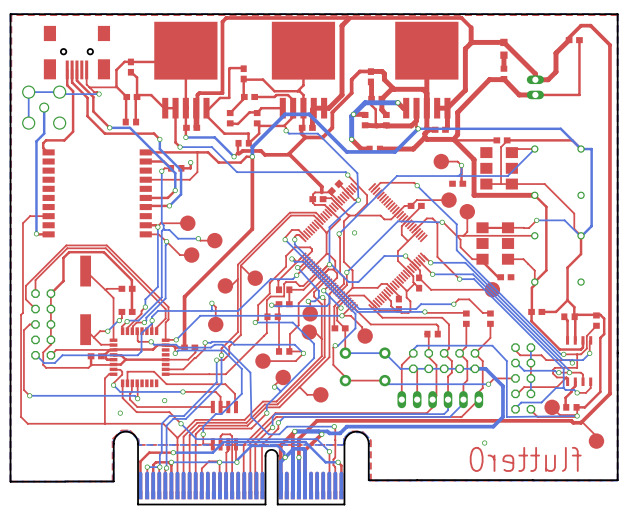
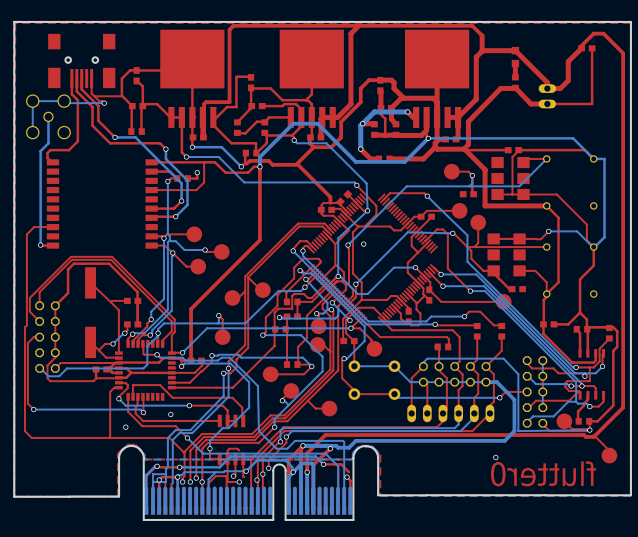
top track: (334, 426) (335, 440) -> none
bottom track: none -> (343, 440) (344, 510)
via: (334, 426) -> none
top track: (189, 435) (189, 495) -> (196, 449) (196, 478)
top track: (183, 436) (183, 495) -> (190, 450) (190, 482)
top track: (232, 436) (232, 495) -> none
top track: (177, 437) (177, 495) -> (183, 452) (184, 476) (182, 482)
top track: (335, 440) (335, 457) (333, 459) (335, 495) -> none
bottom track: (305, 442) (325, 462) (338, 462) -> (313, 456) (323, 464)
top track: none -> (227, 458) (227, 482) (239, 482)
top track: (262, 444) (262, 495) -> (269, 459) (268, 468)
bottom track: (251, 445) (236, 462) (171, 462) -> (258, 460) (246, 471) (184, 472) (181, 475) (177, 475) (177, 510)
top track: none -> (323, 464) (341, 464) (349, 472)
top track: (228, 450) (226, 452) (226, 495) -> (235, 465) (235, 476) (233, 476)
bottom track: none -> (157, 466) (146, 475) (146, 510)
via: none -> (157, 466)
bottom track: none -> (338, 466) (337, 511)
via position: (329, 451) -> (323, 464)
via: none -> (268, 468)
via: none -> (246, 471)
bottom track: none -> (215, 472) (208, 479) (208, 510)
bottom track: none -> (165, 474) (153, 474) (153, 510)
via: none -> (262, 474)
via: none -> (233, 476)
via: (219, 462) -> none
via: (236, 462) -> none
via: none -> (196, 478)
via: none -> (159, 479)
via: none -> (256, 480)
via: (147, 467) -> none
via: (159, 467) -> none
via: none -> (182, 482)
via: none -> (190, 482)
via: none -> (202, 482)
via: none -> (239, 482)
via: (166, 468) -> none

